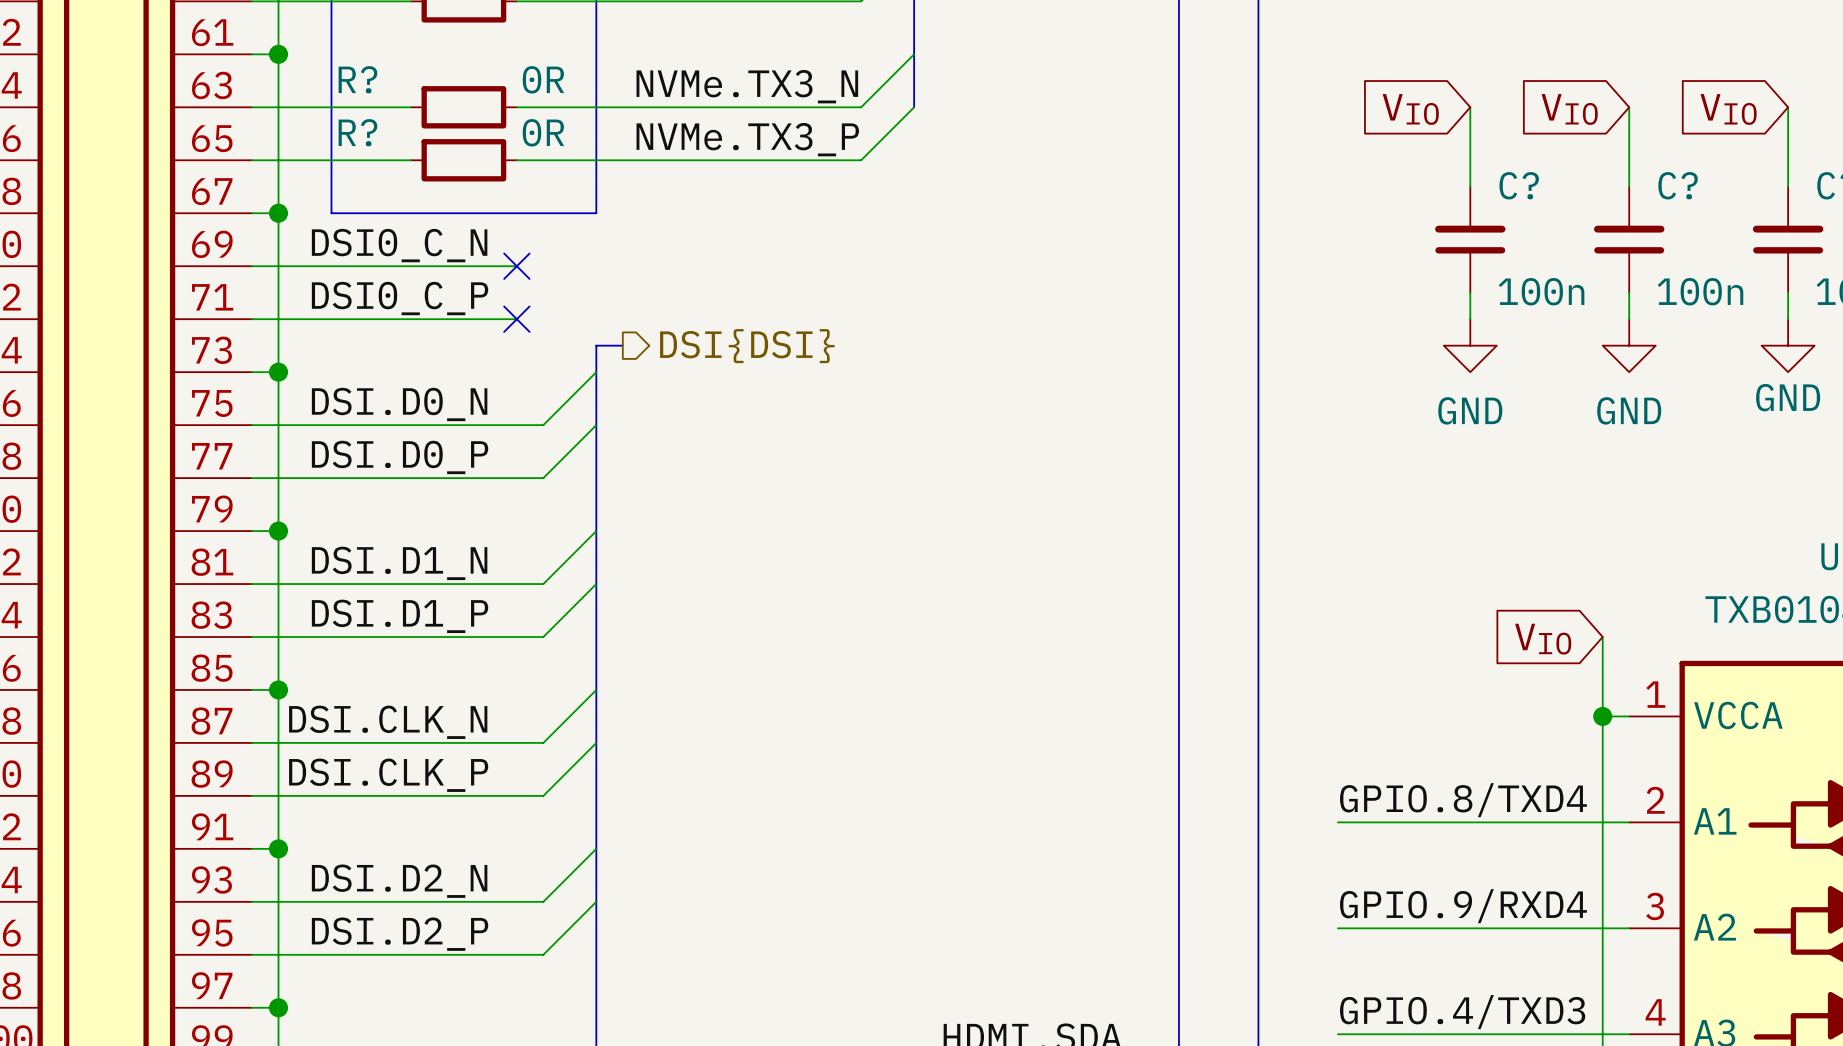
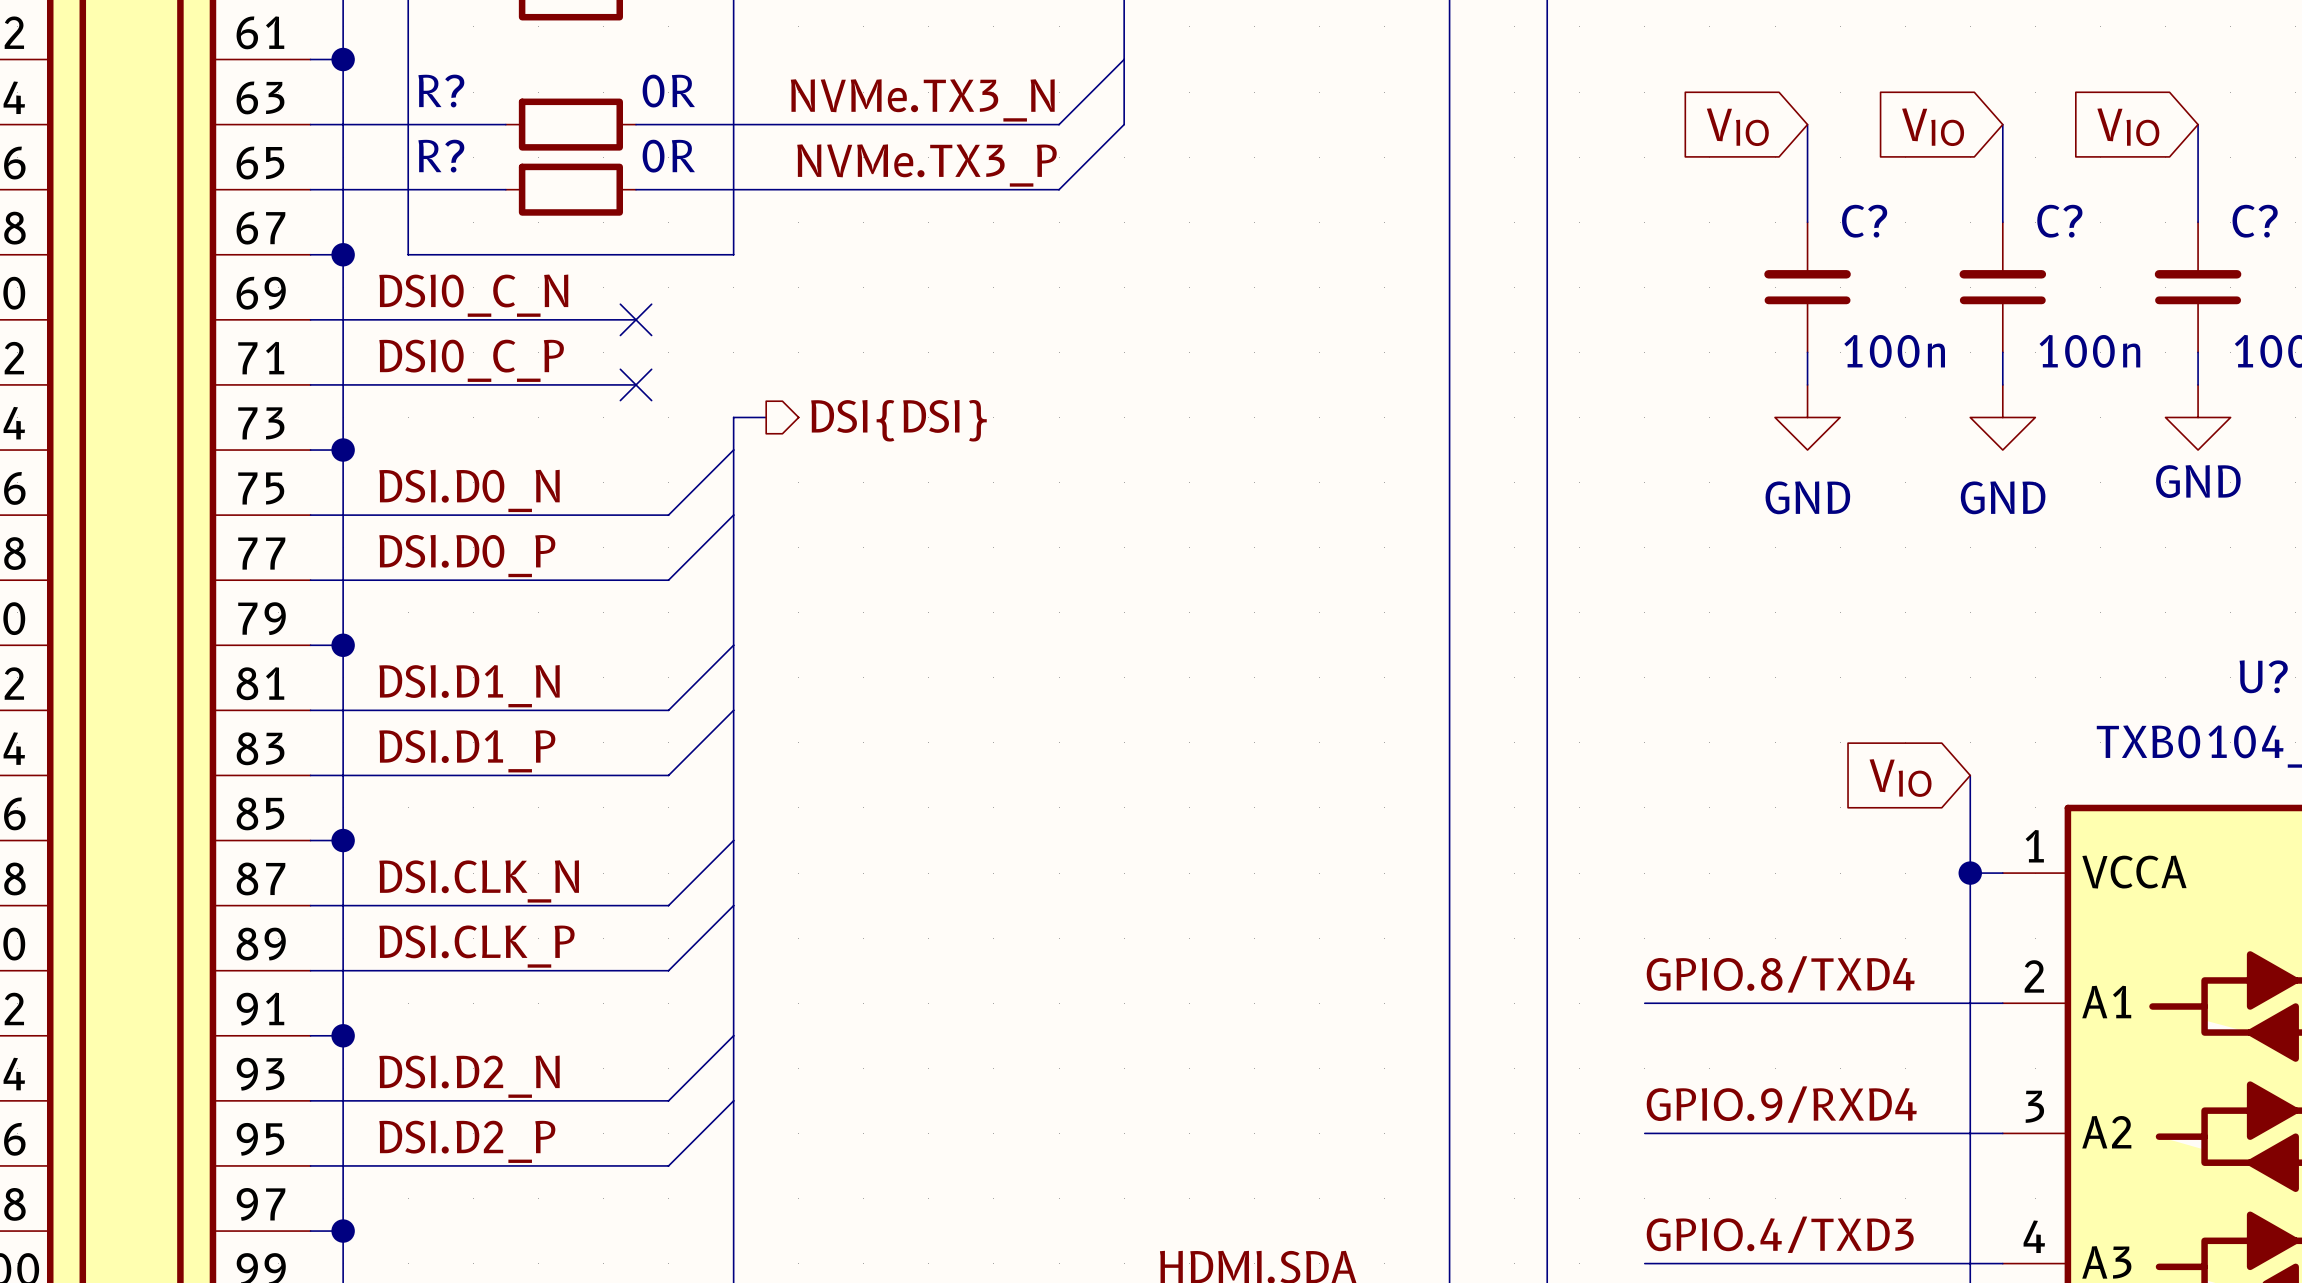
label position: DSI0_C_N (399, 245) -> DSI0_C_N (473, 295)
label position: DSI0_C_P (400, 298) -> DSI0_C_P (471, 360)
label position: DSI.D0_N (399, 404) -> DSI.D0_N (469, 490)
label position: DSI.D0_P (400, 457) -> DSI.D0_P (467, 556)
label position: DSI.D1_N (399, 563) -> DSI.D1_N (469, 686)
label position: DSI.D1_P (400, 616) -> DSI.D1_P (467, 751)
label position: DSI.CLK_N (388, 722) -> DSI.CLK_N (479, 881)
label position: DSI.CLK_P (388, 775) -> DSI.CLK_P (476, 946)
label position: DSI.D2_N (399, 881) -> DSI.D2_N (469, 1076)
label position: DSI.D2_P (400, 934) -> DSI.D2_P (467, 1141)

